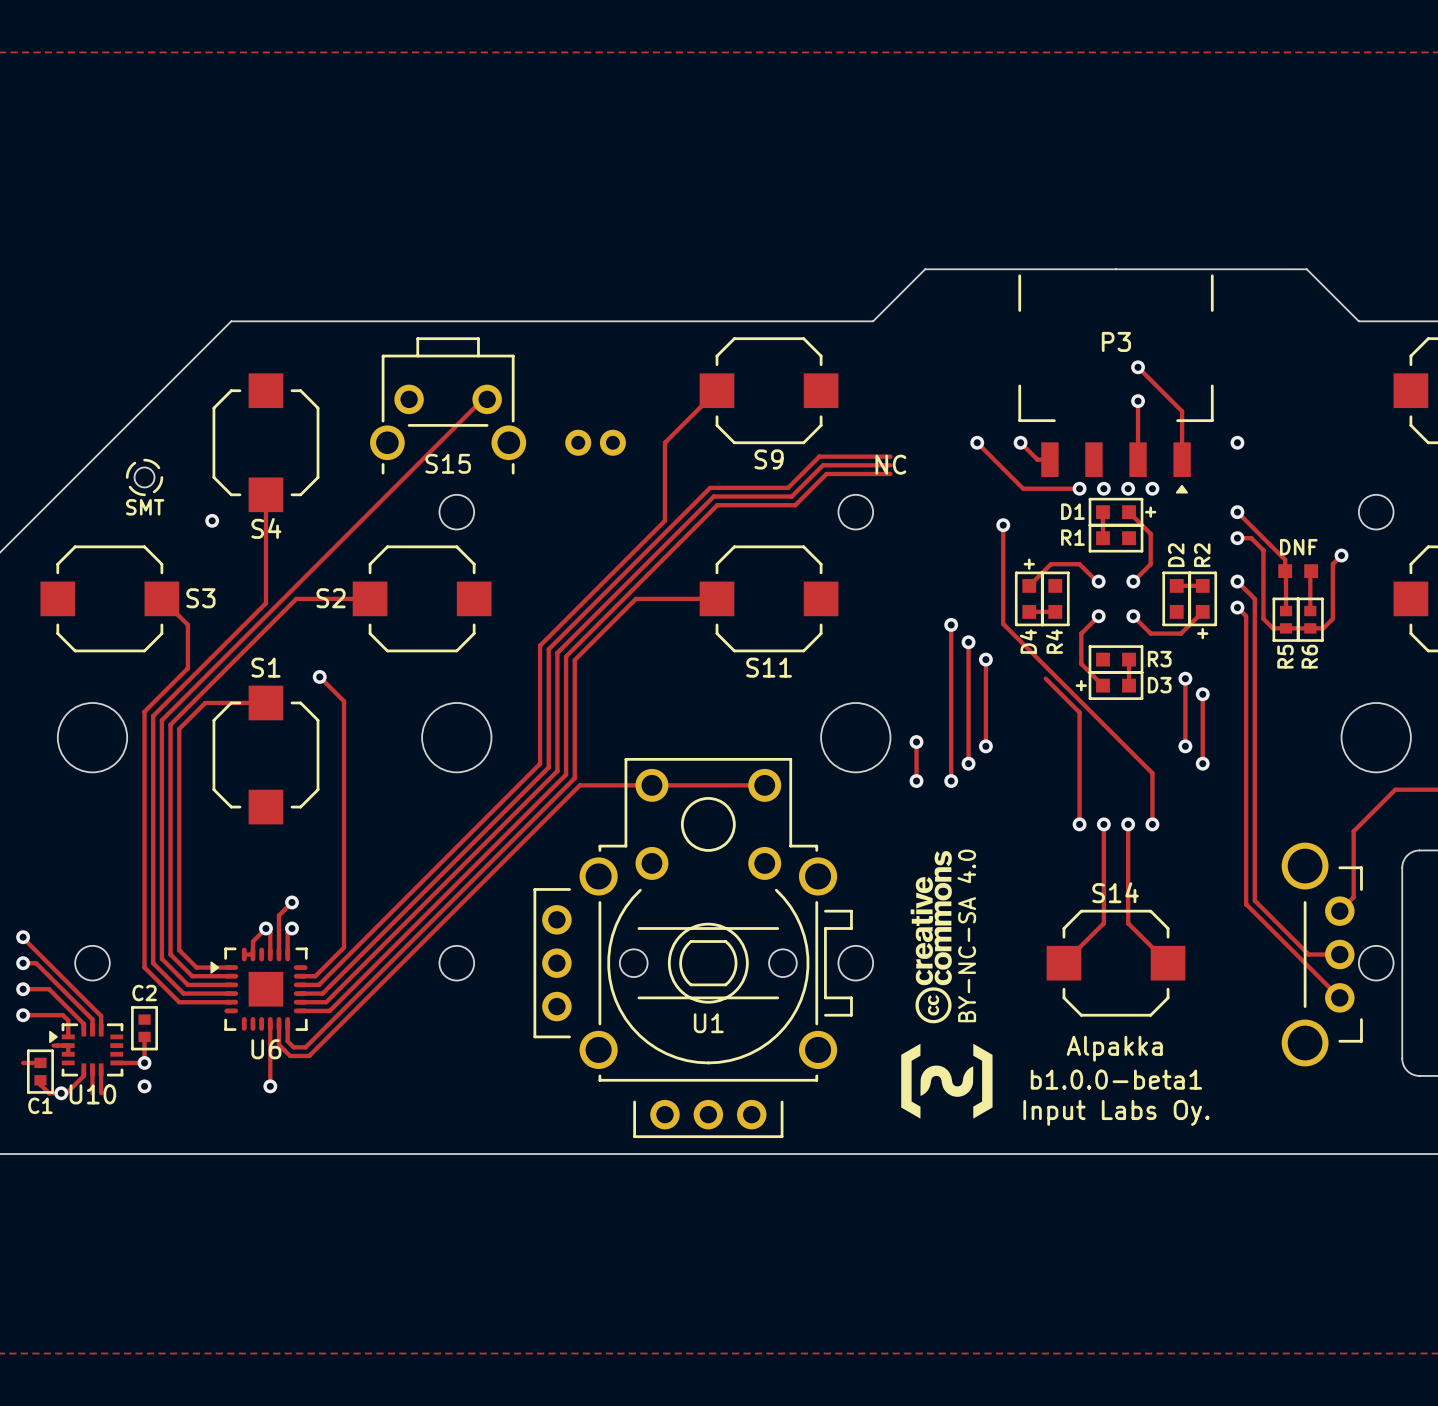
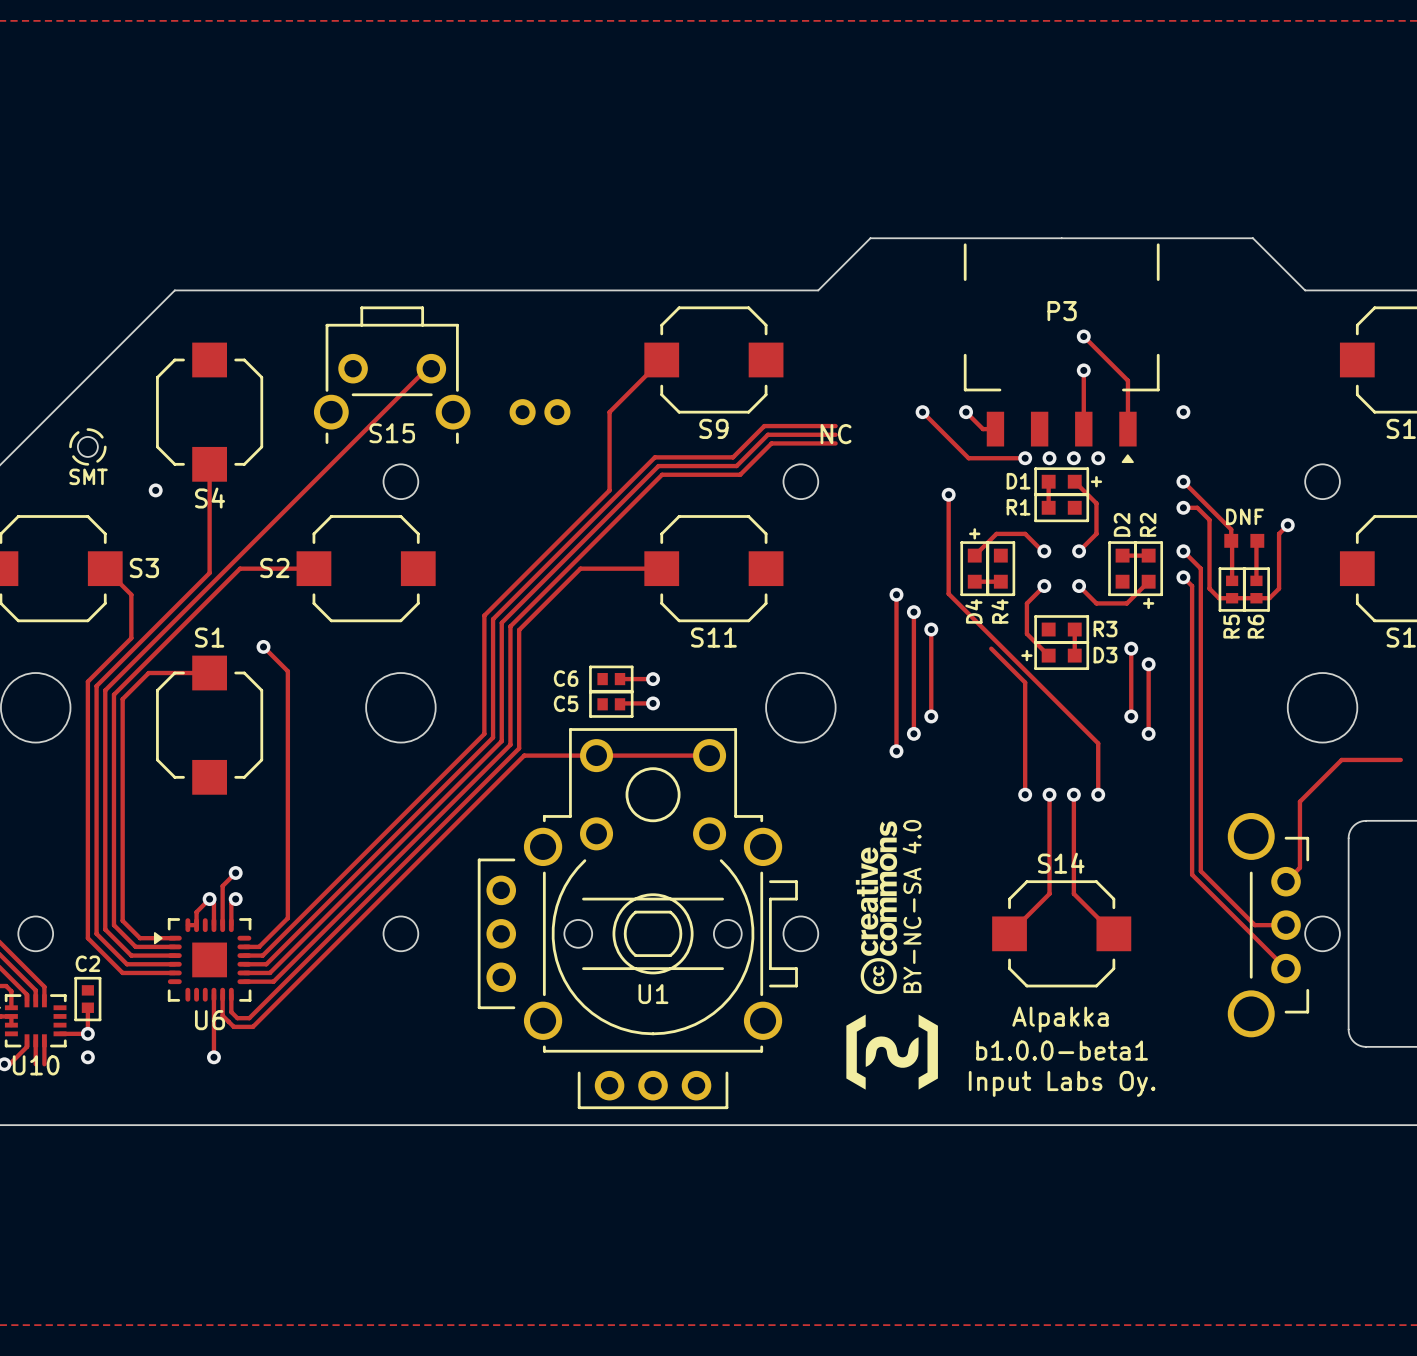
C6: none -> (611, 679)
track: none -> (620, 679) (653, 679)
via: none -> (653, 679)
track: none -> (653, 703) (620, 704)
via: none -> (653, 703)
C5: none -> (611, 704)
track: (916, 742) (916, 781) -> none
via: (916, 742) -> none
via: (916, 781) -> none

